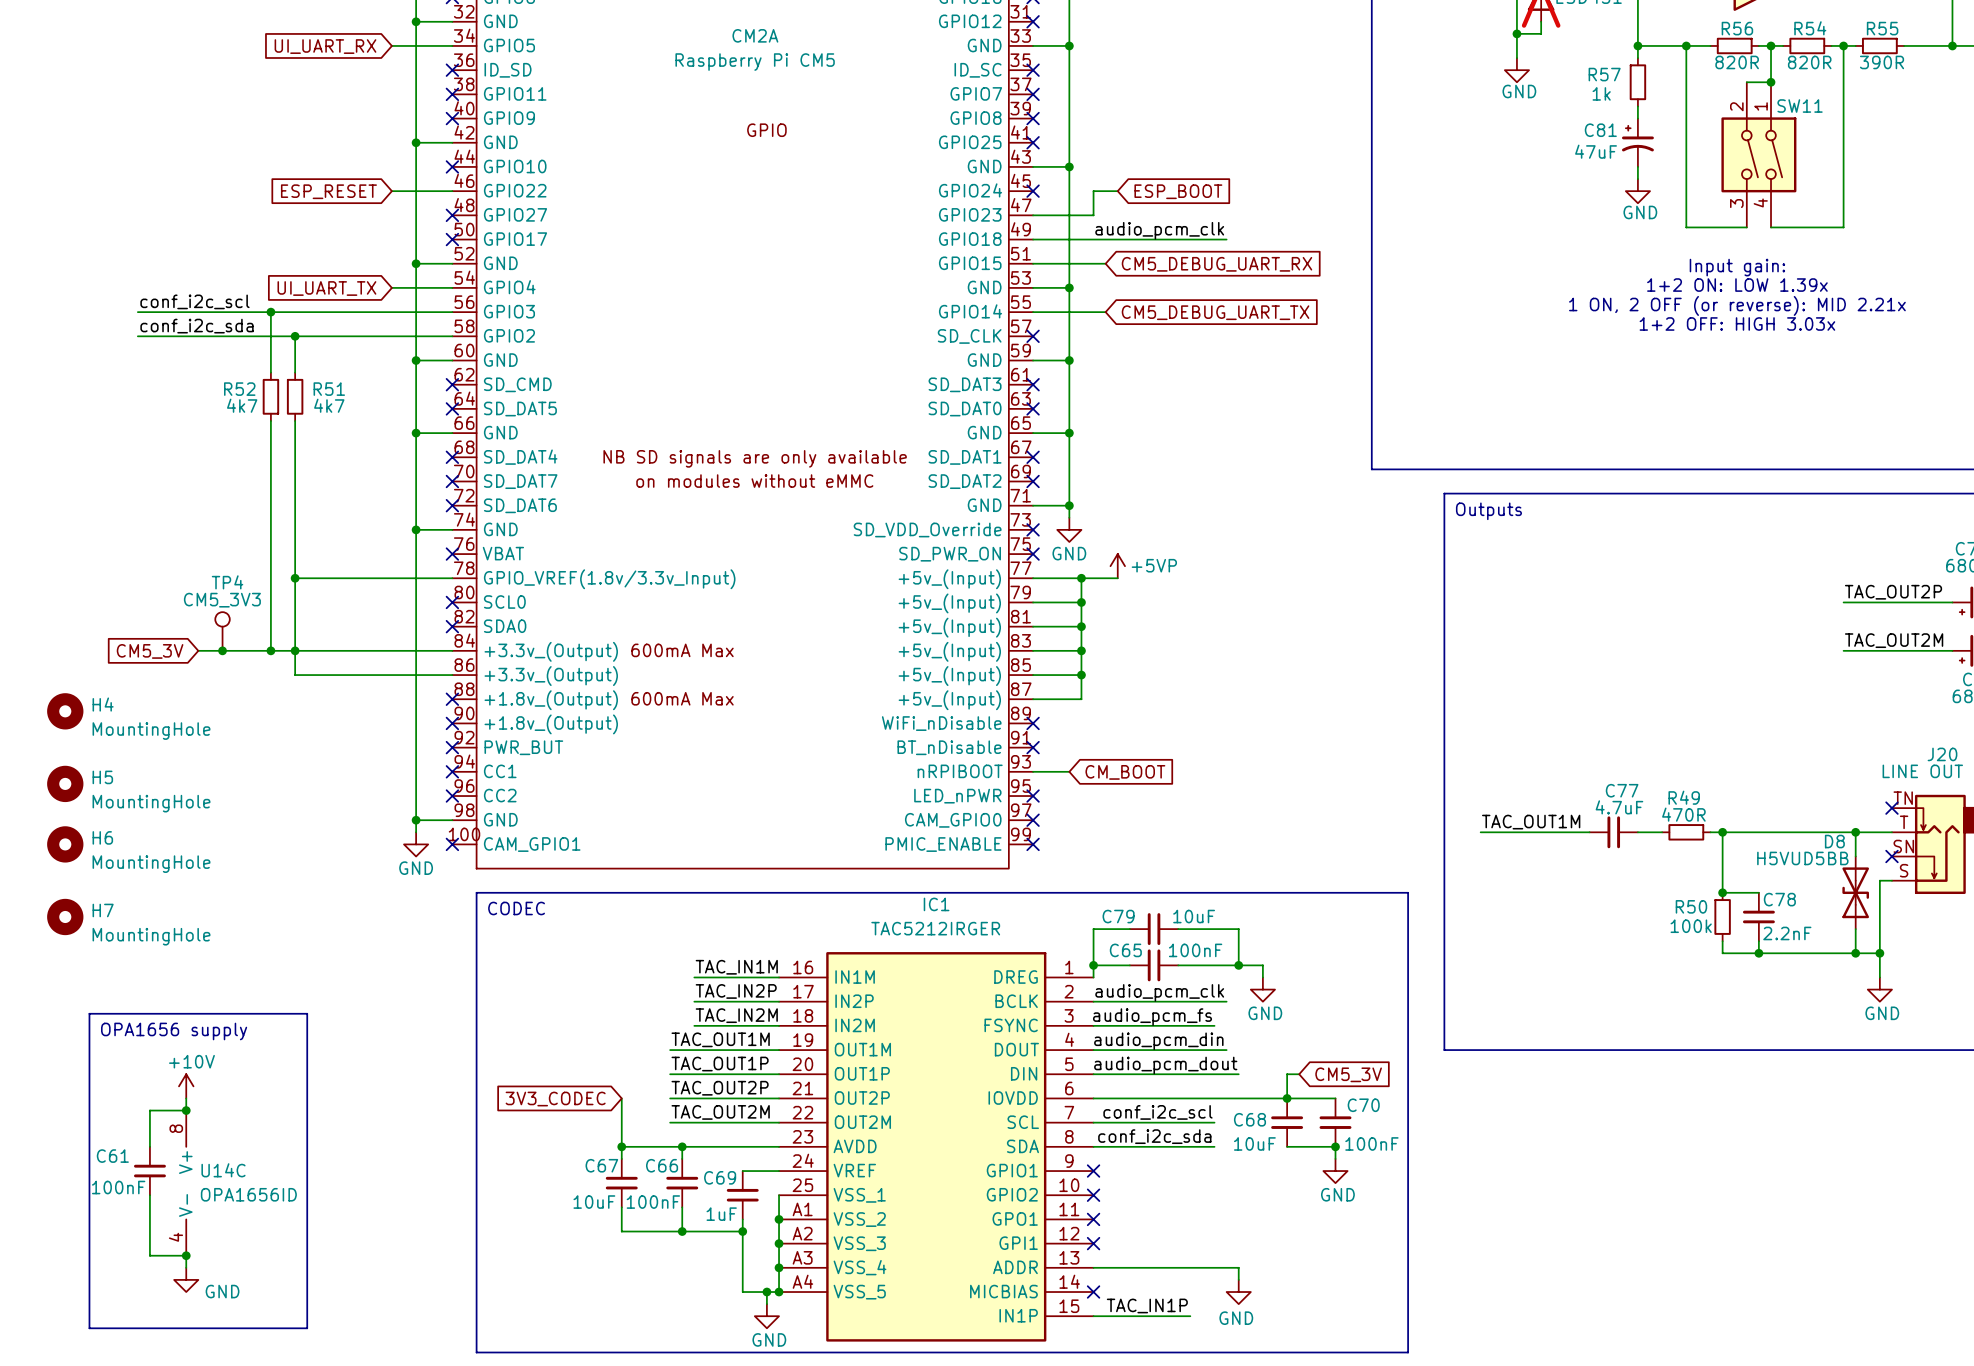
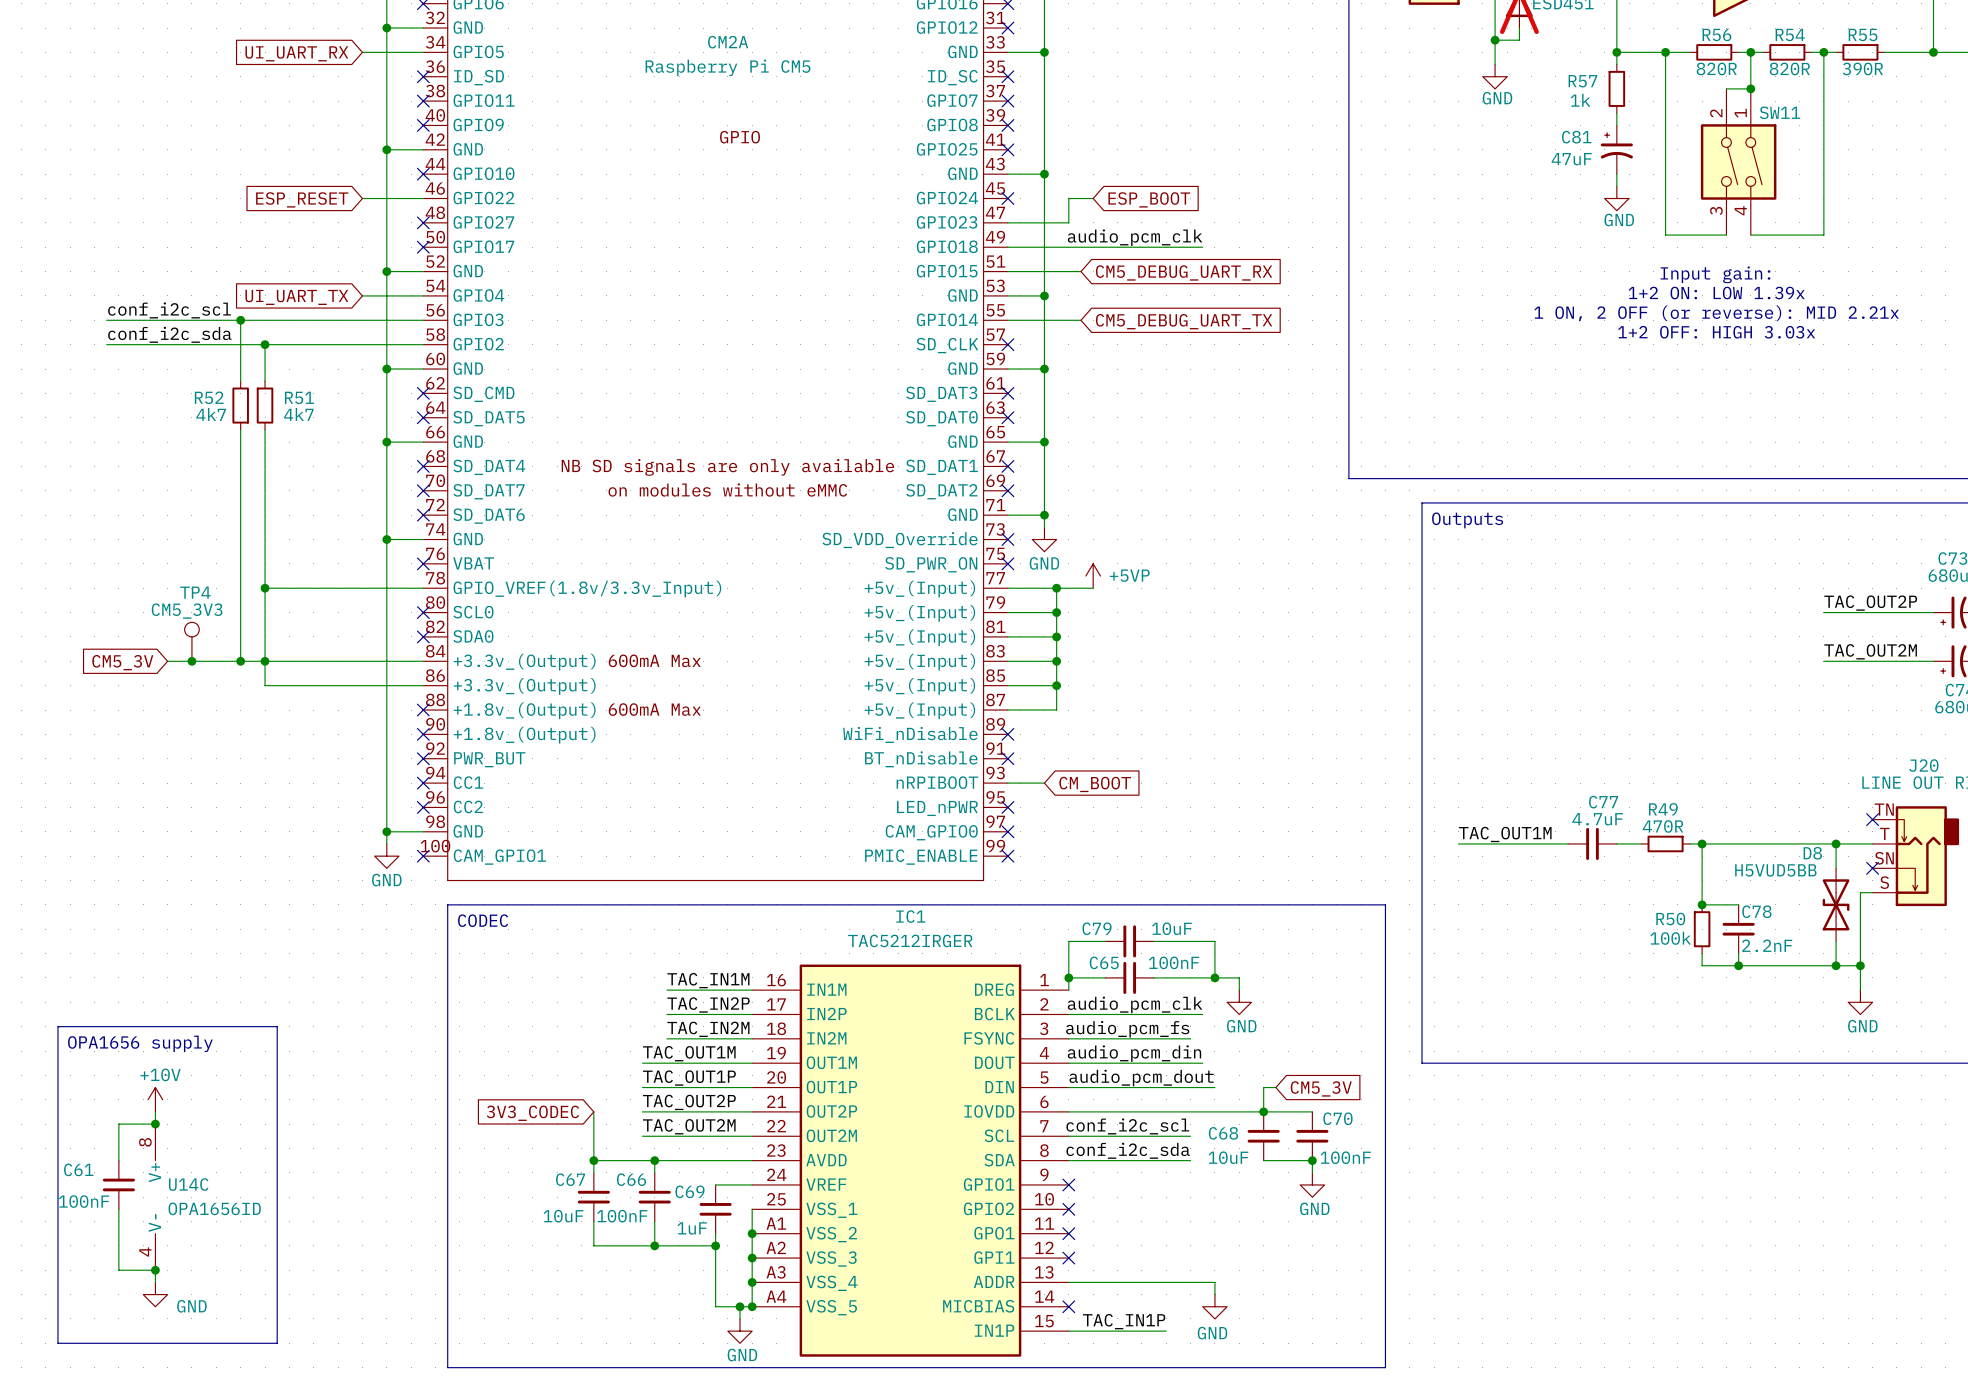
H4: MountingHole (65, 711) -> none
H5: MountingHole (65, 783) -> none
H6: MountingHole (65, 844) -> none
H7: MountingHole (65, 916) -> none

